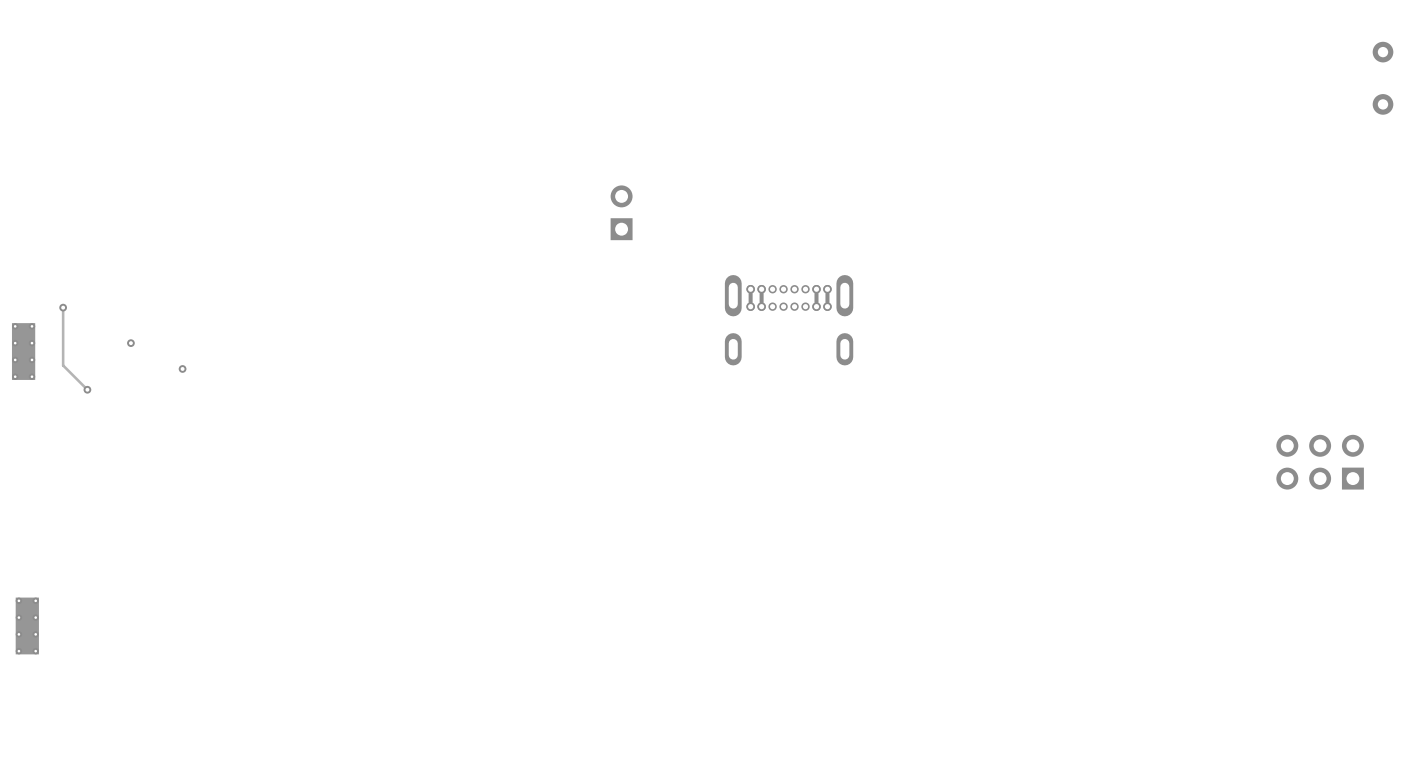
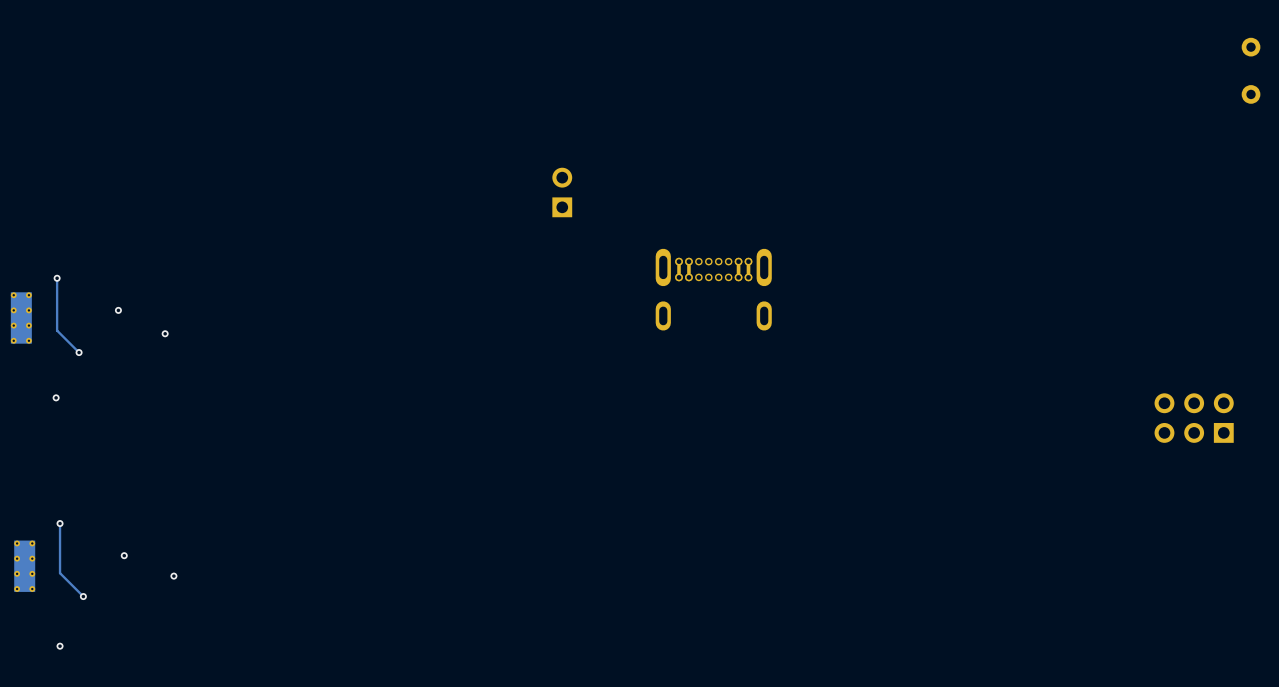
via: none -> (56, 397)
track: none -> (60, 523) (60, 573) (83, 596)
via: none -> (60, 523)
via: none -> (124, 555)
via: none -> (173, 576)
via: none -> (83, 596)
via: none -> (60, 646)

